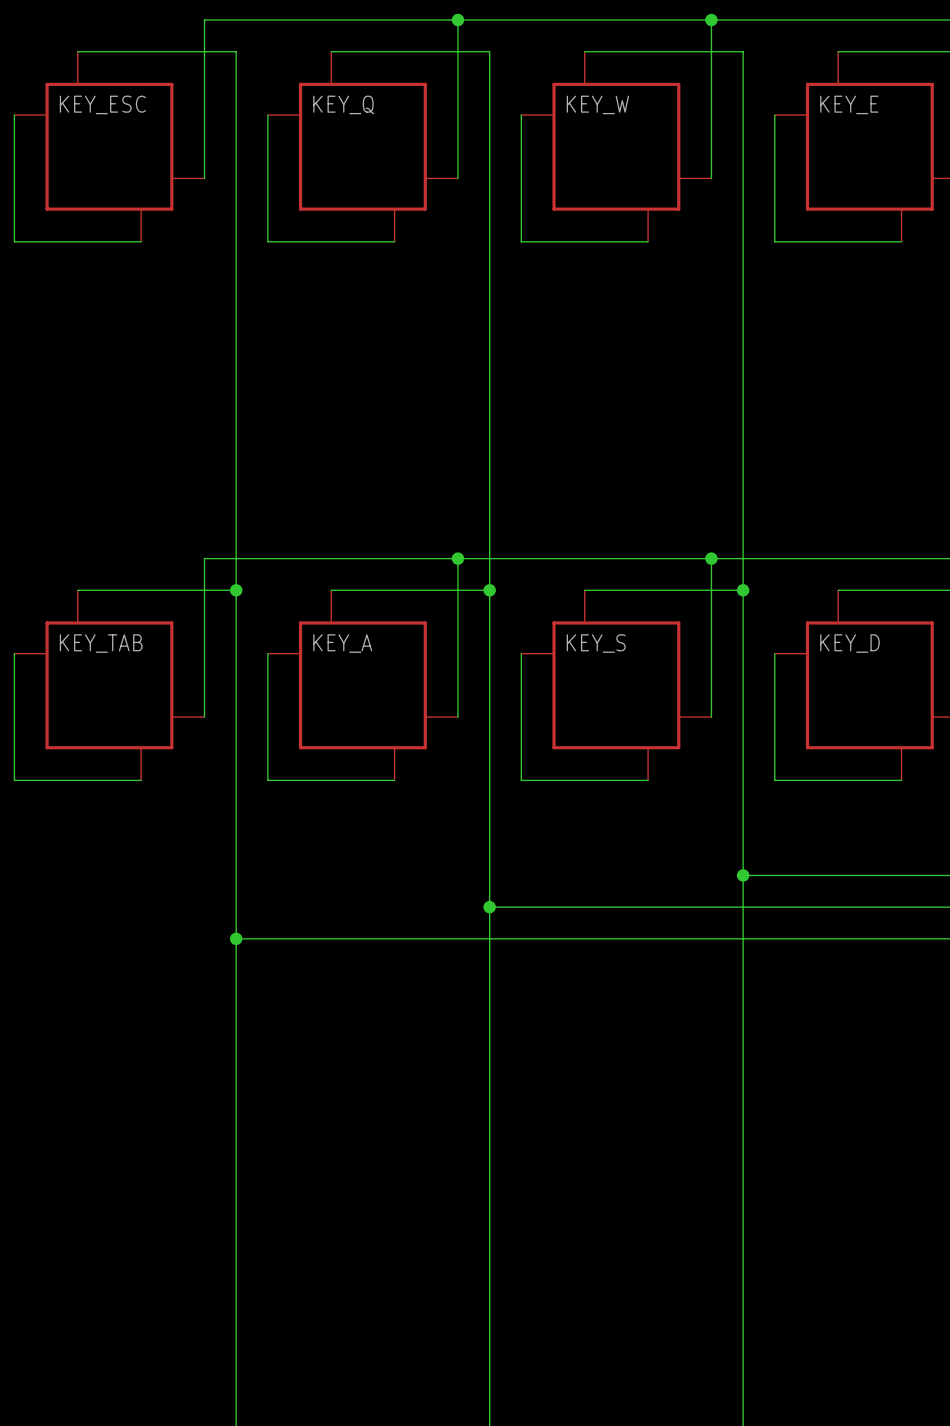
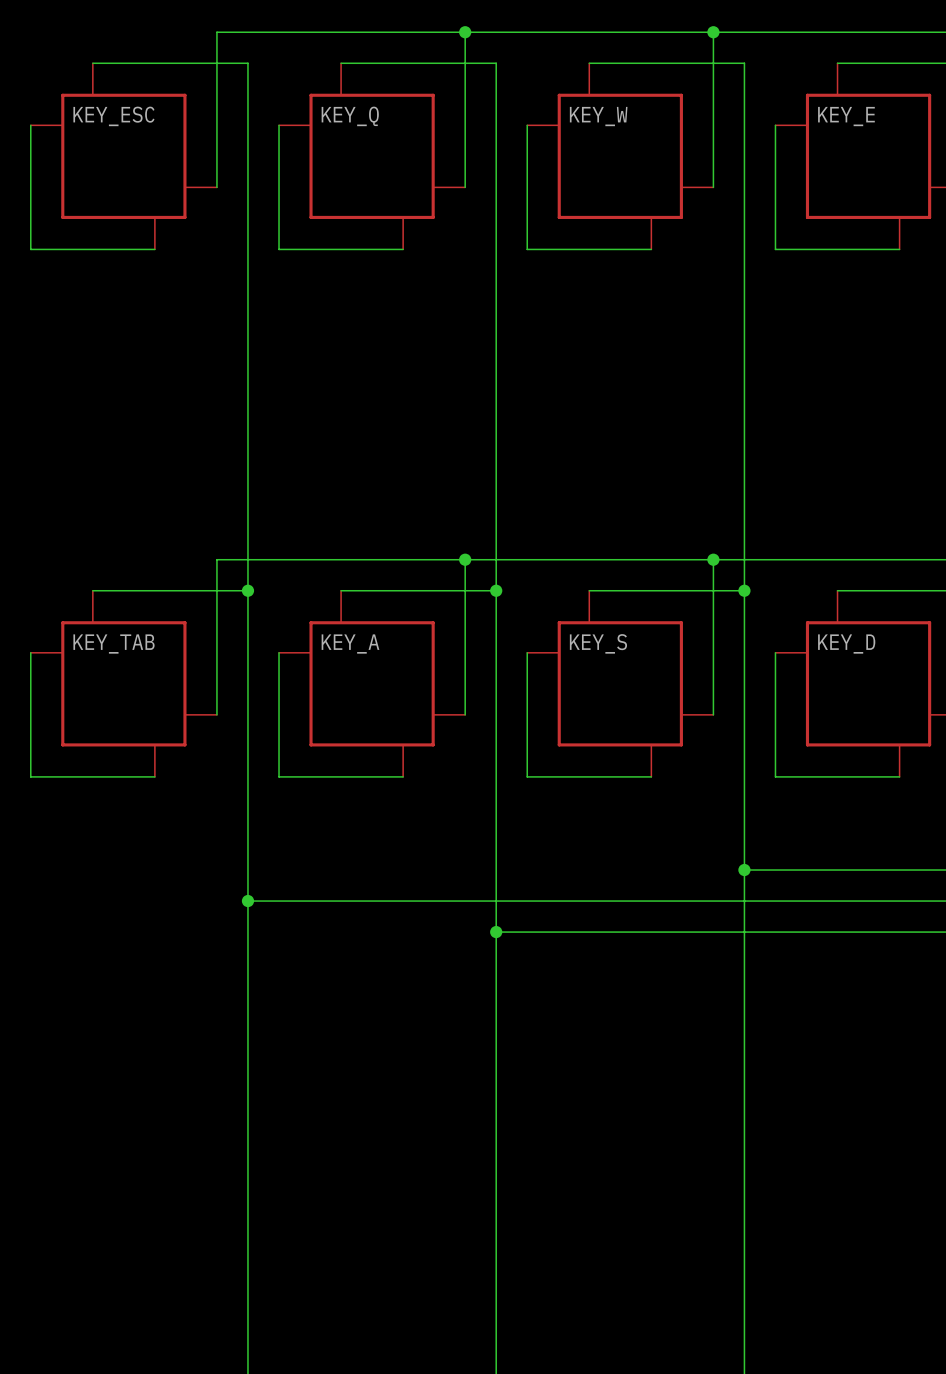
junction position: (489, 907) -> (496, 932)
wire: (236, 938) (489, 938) -> (247, 901) (496, 901)
junction position: (236, 938) -> (247, 901)

